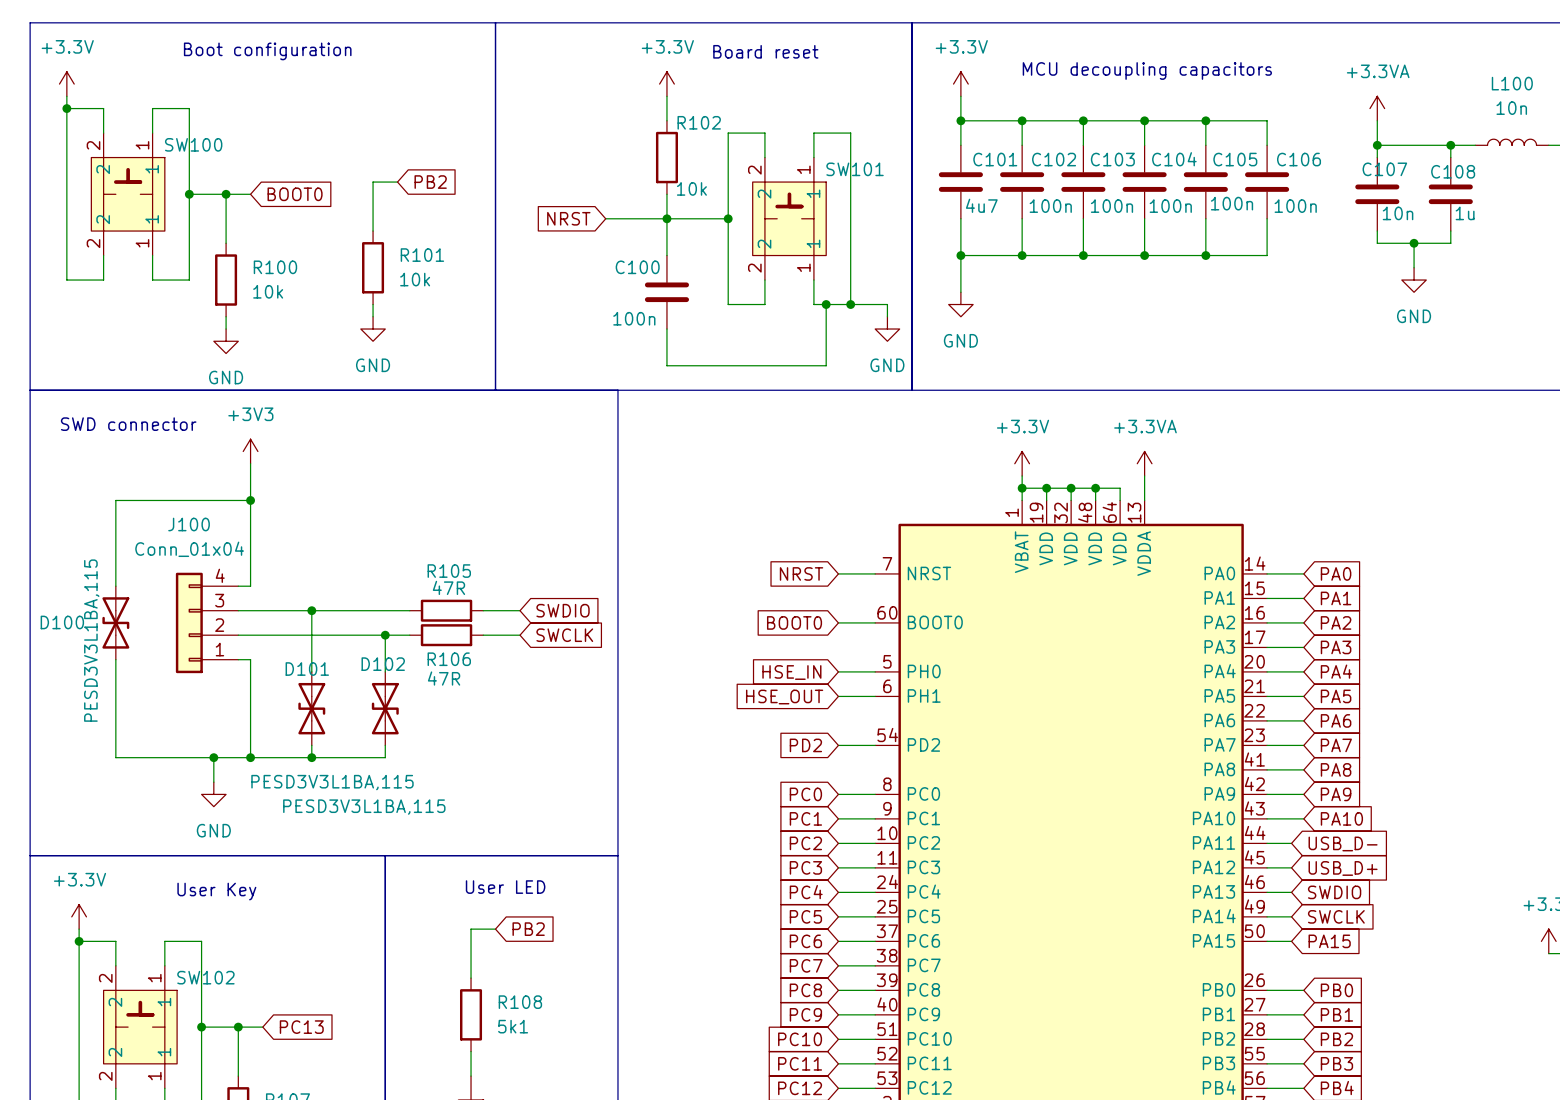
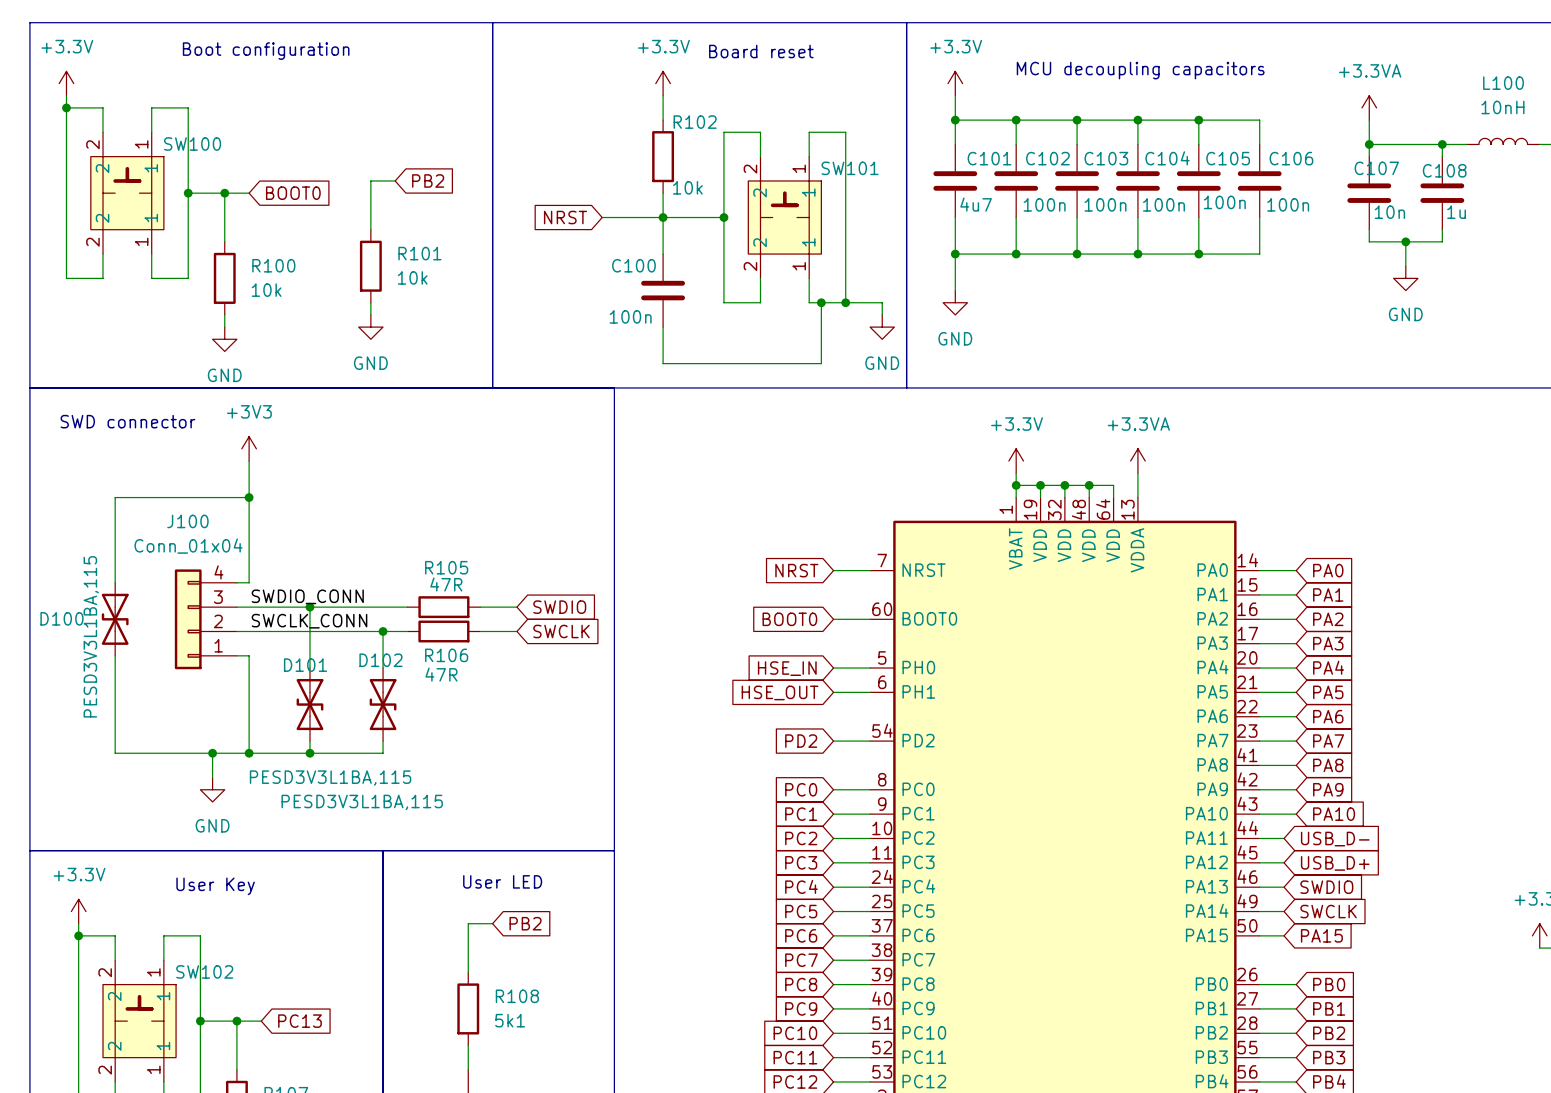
L100 value: 10n (1511, 108) -> 10nH (1502, 107)
label: none -> SWDIO_CONN (307, 596)
label: none -> SWCLK_CONN (309, 621)

